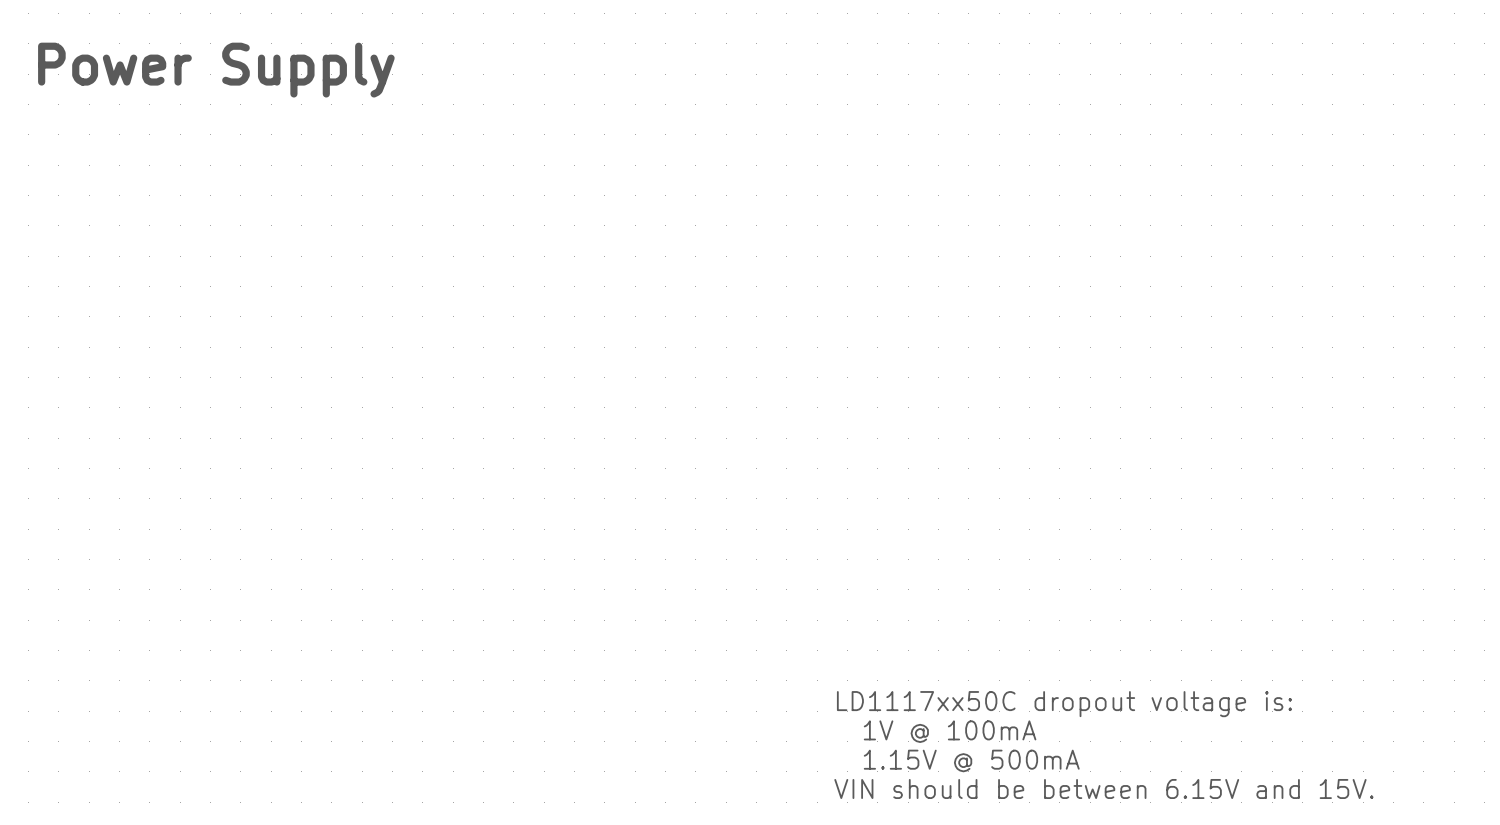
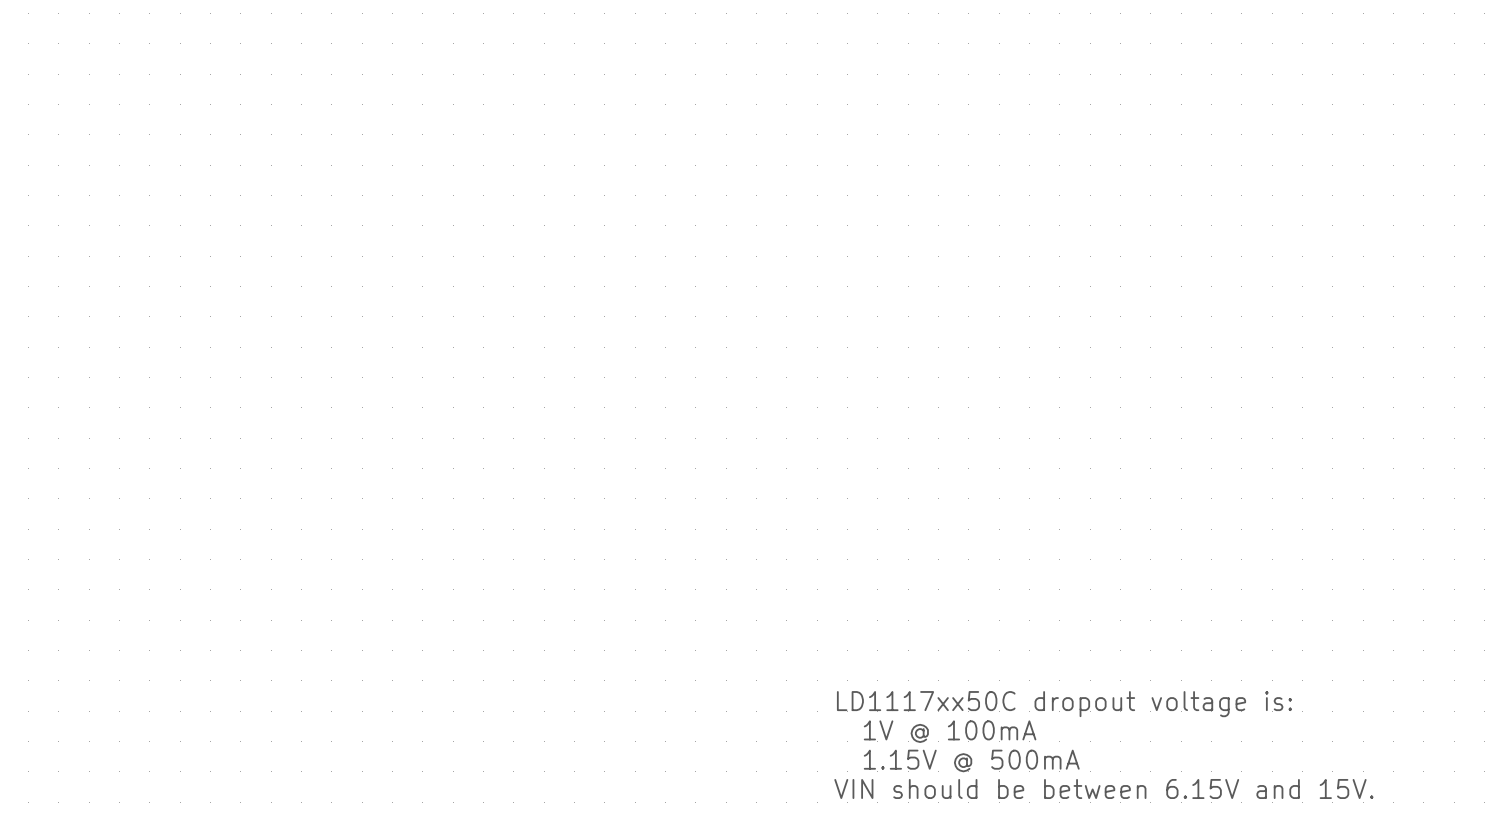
text: Power Supply (216, 70) -> none

